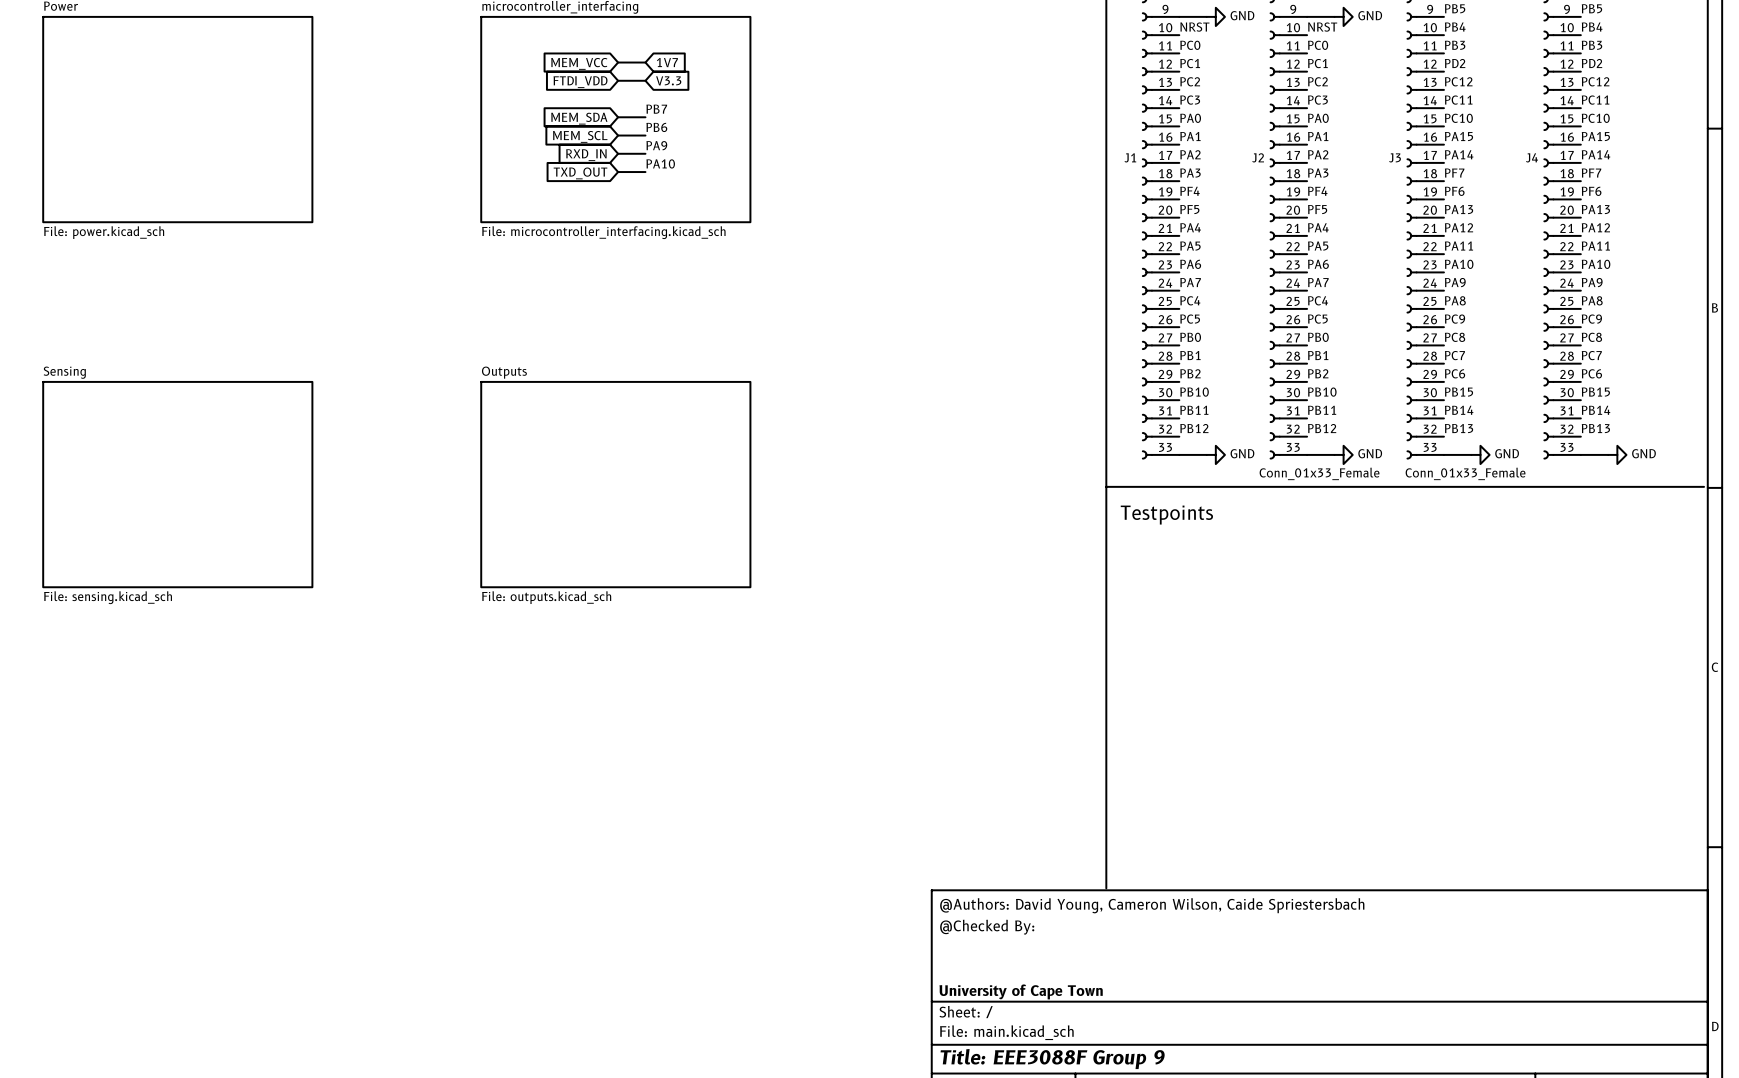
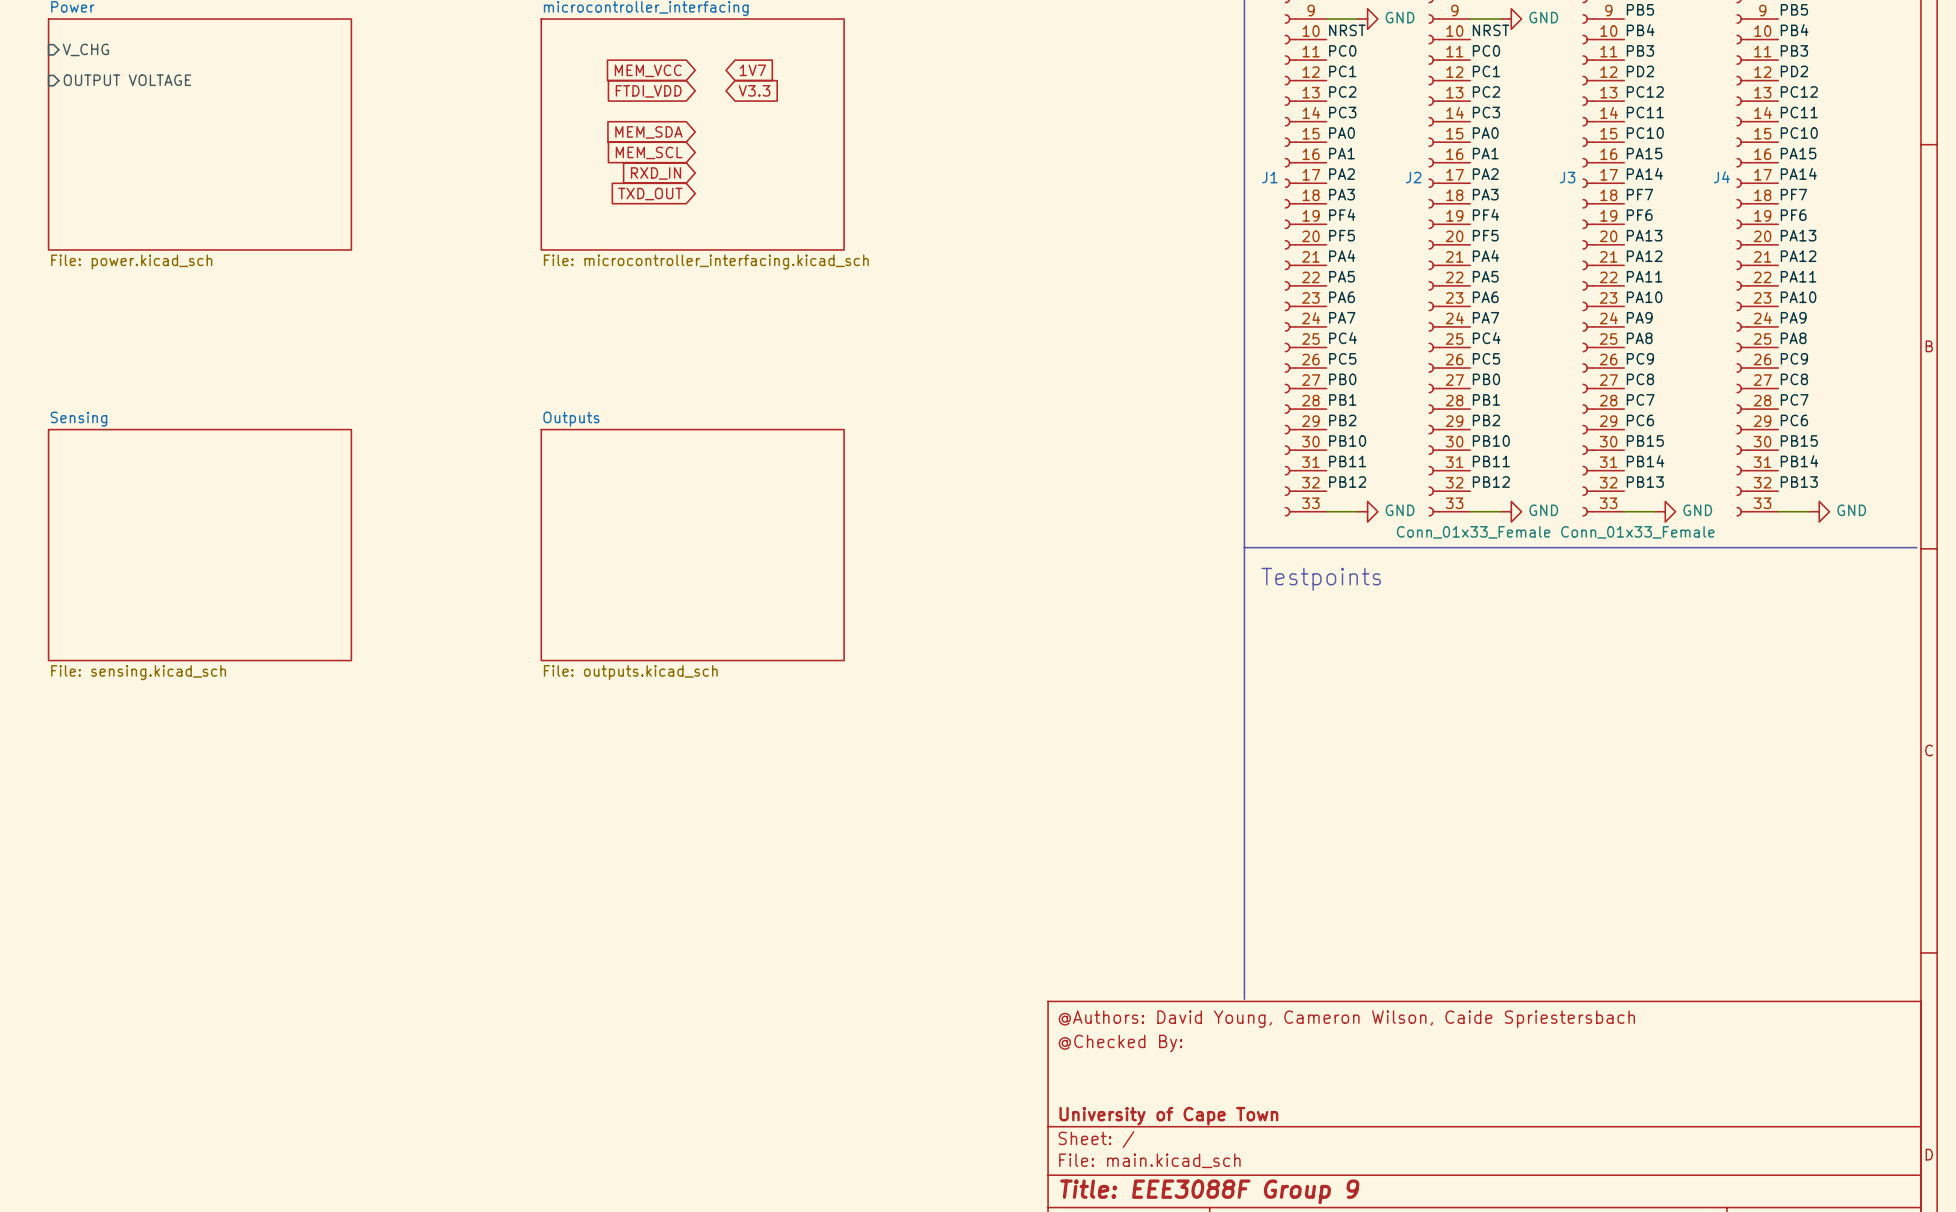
sheet pin: none -> V_CHG (85, 49)
wire: (618, 62) (645, 62) -> none
sheet pin: none -> OUTPUT VOLTAGE (127, 80)
wire: (618, 80) (645, 80) -> none
label: PB7 (656, 109) -> none
wire: (618, 117) (645, 117) -> none
label: PB6 (656, 127) -> none
wire: (618, 135) (645, 135) -> none
label: PA9 (656, 145) -> none
wire: (618, 153) (645, 153) -> none
label: PA10 (660, 163) -> none
wire: (618, 172) (645, 172) -> none

